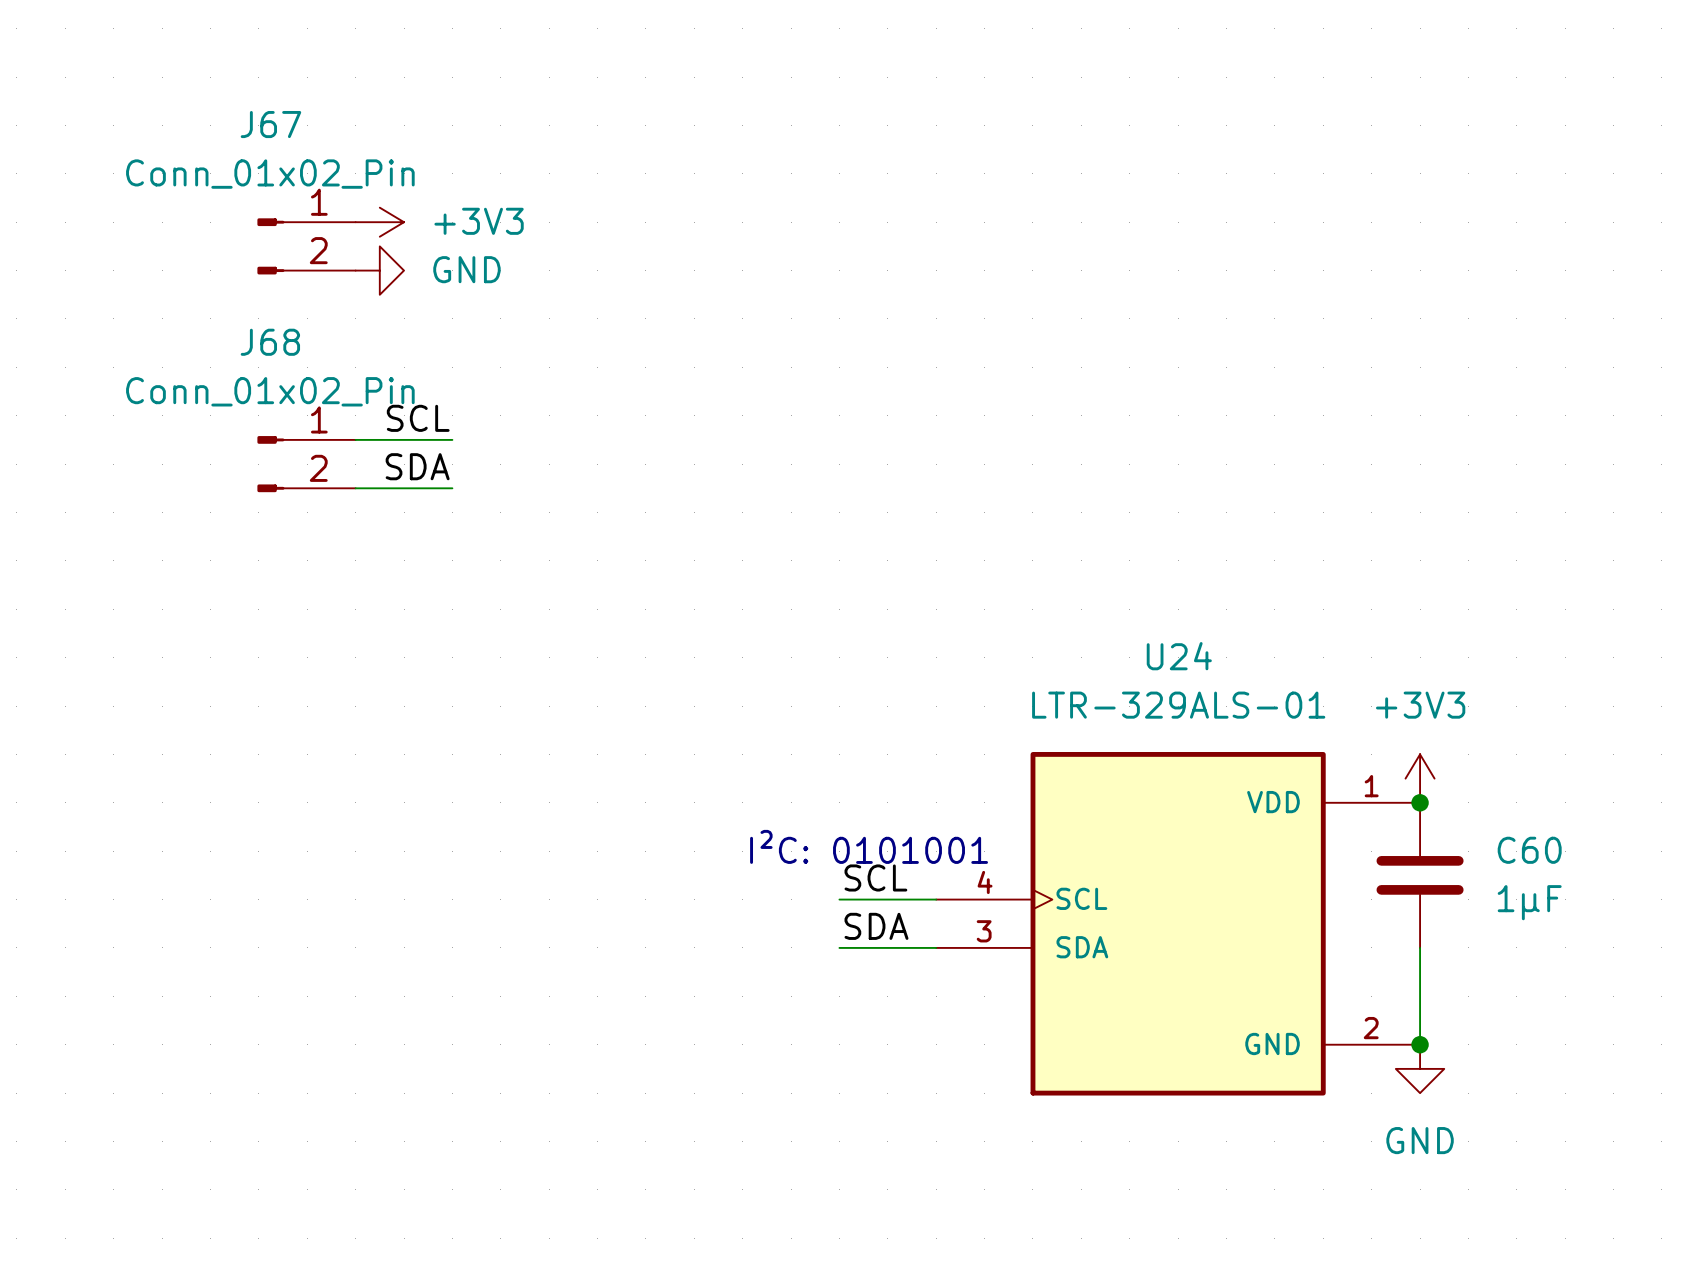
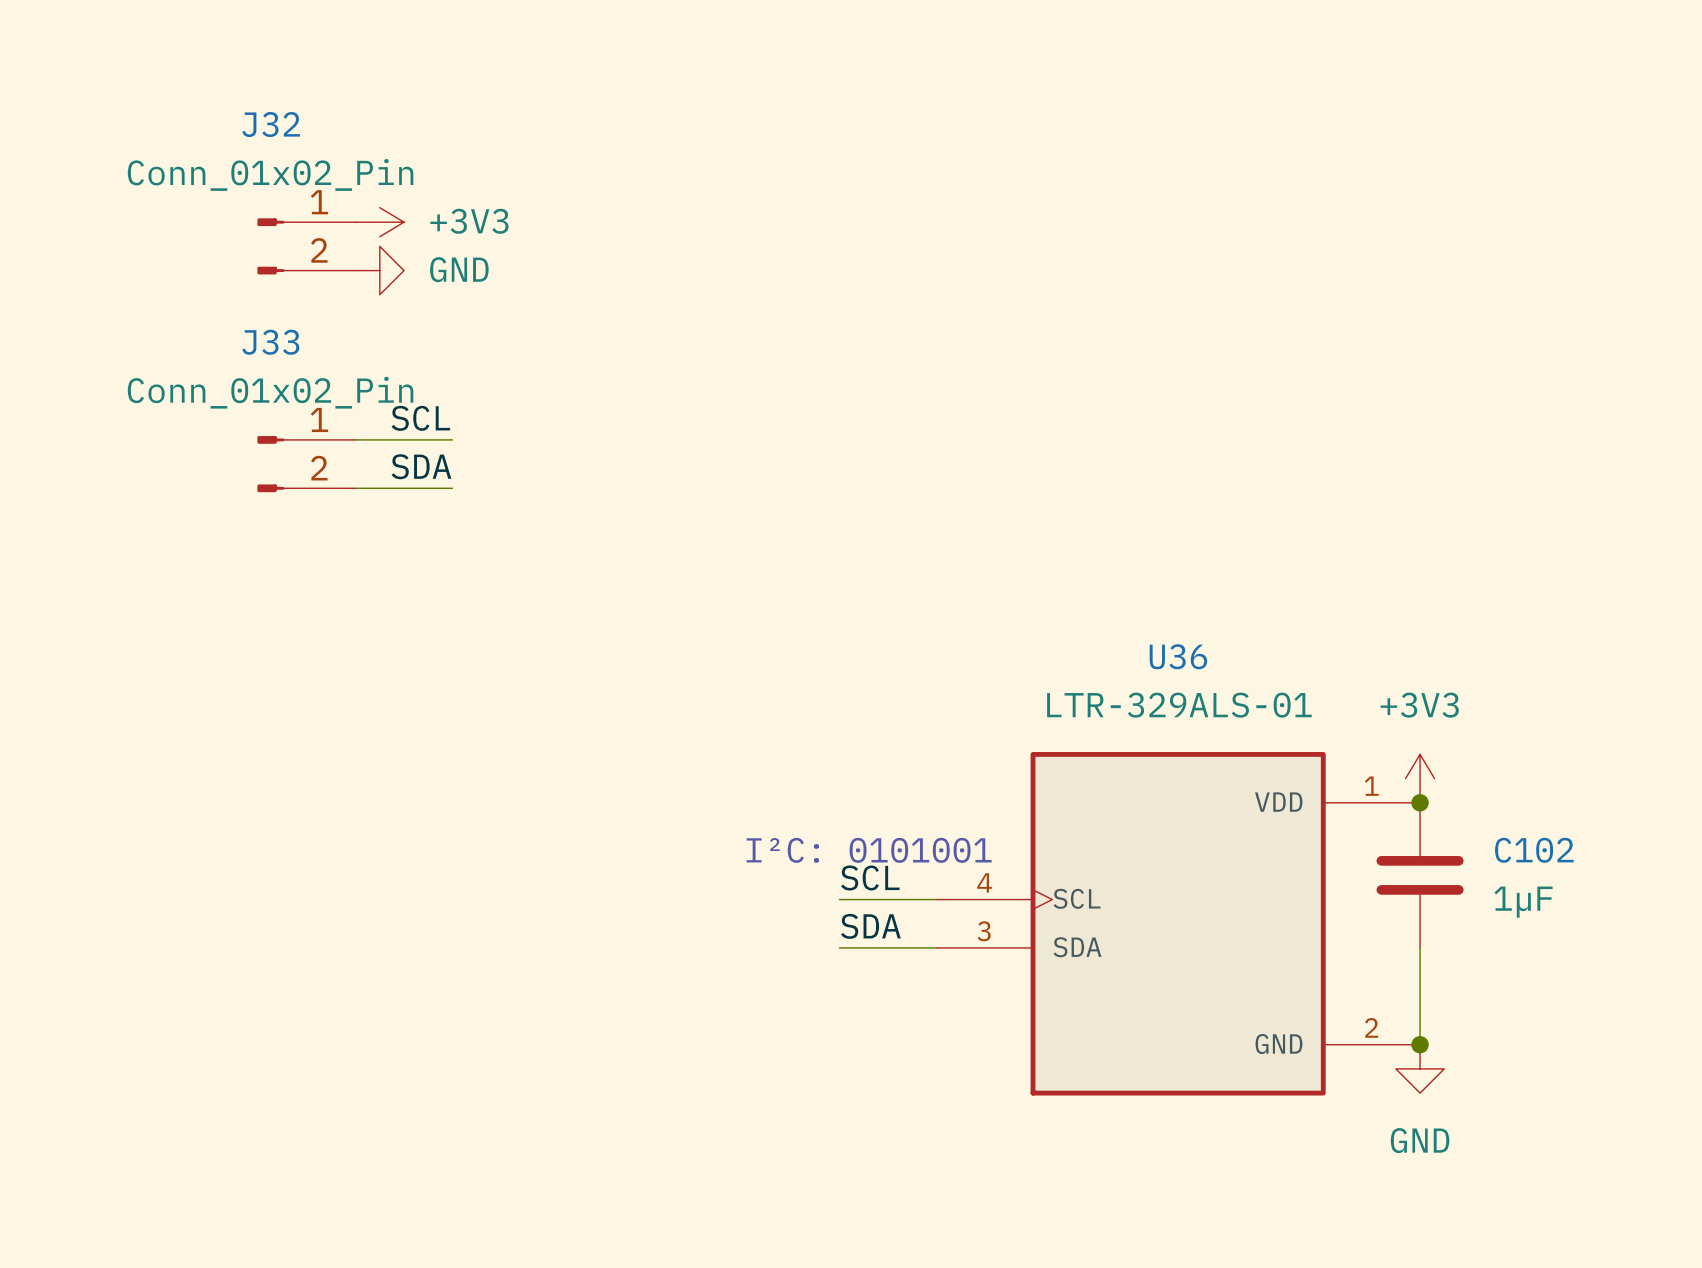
J67 name: J67 (270, 124) -> J32 (271, 124)
J68 name: J68 (270, 342) -> J33 (270, 342)
U24 name: U24 (1179, 656) -> U36 (1178, 656)
C60 name: C60 (1529, 850) -> C102 (1534, 850)

